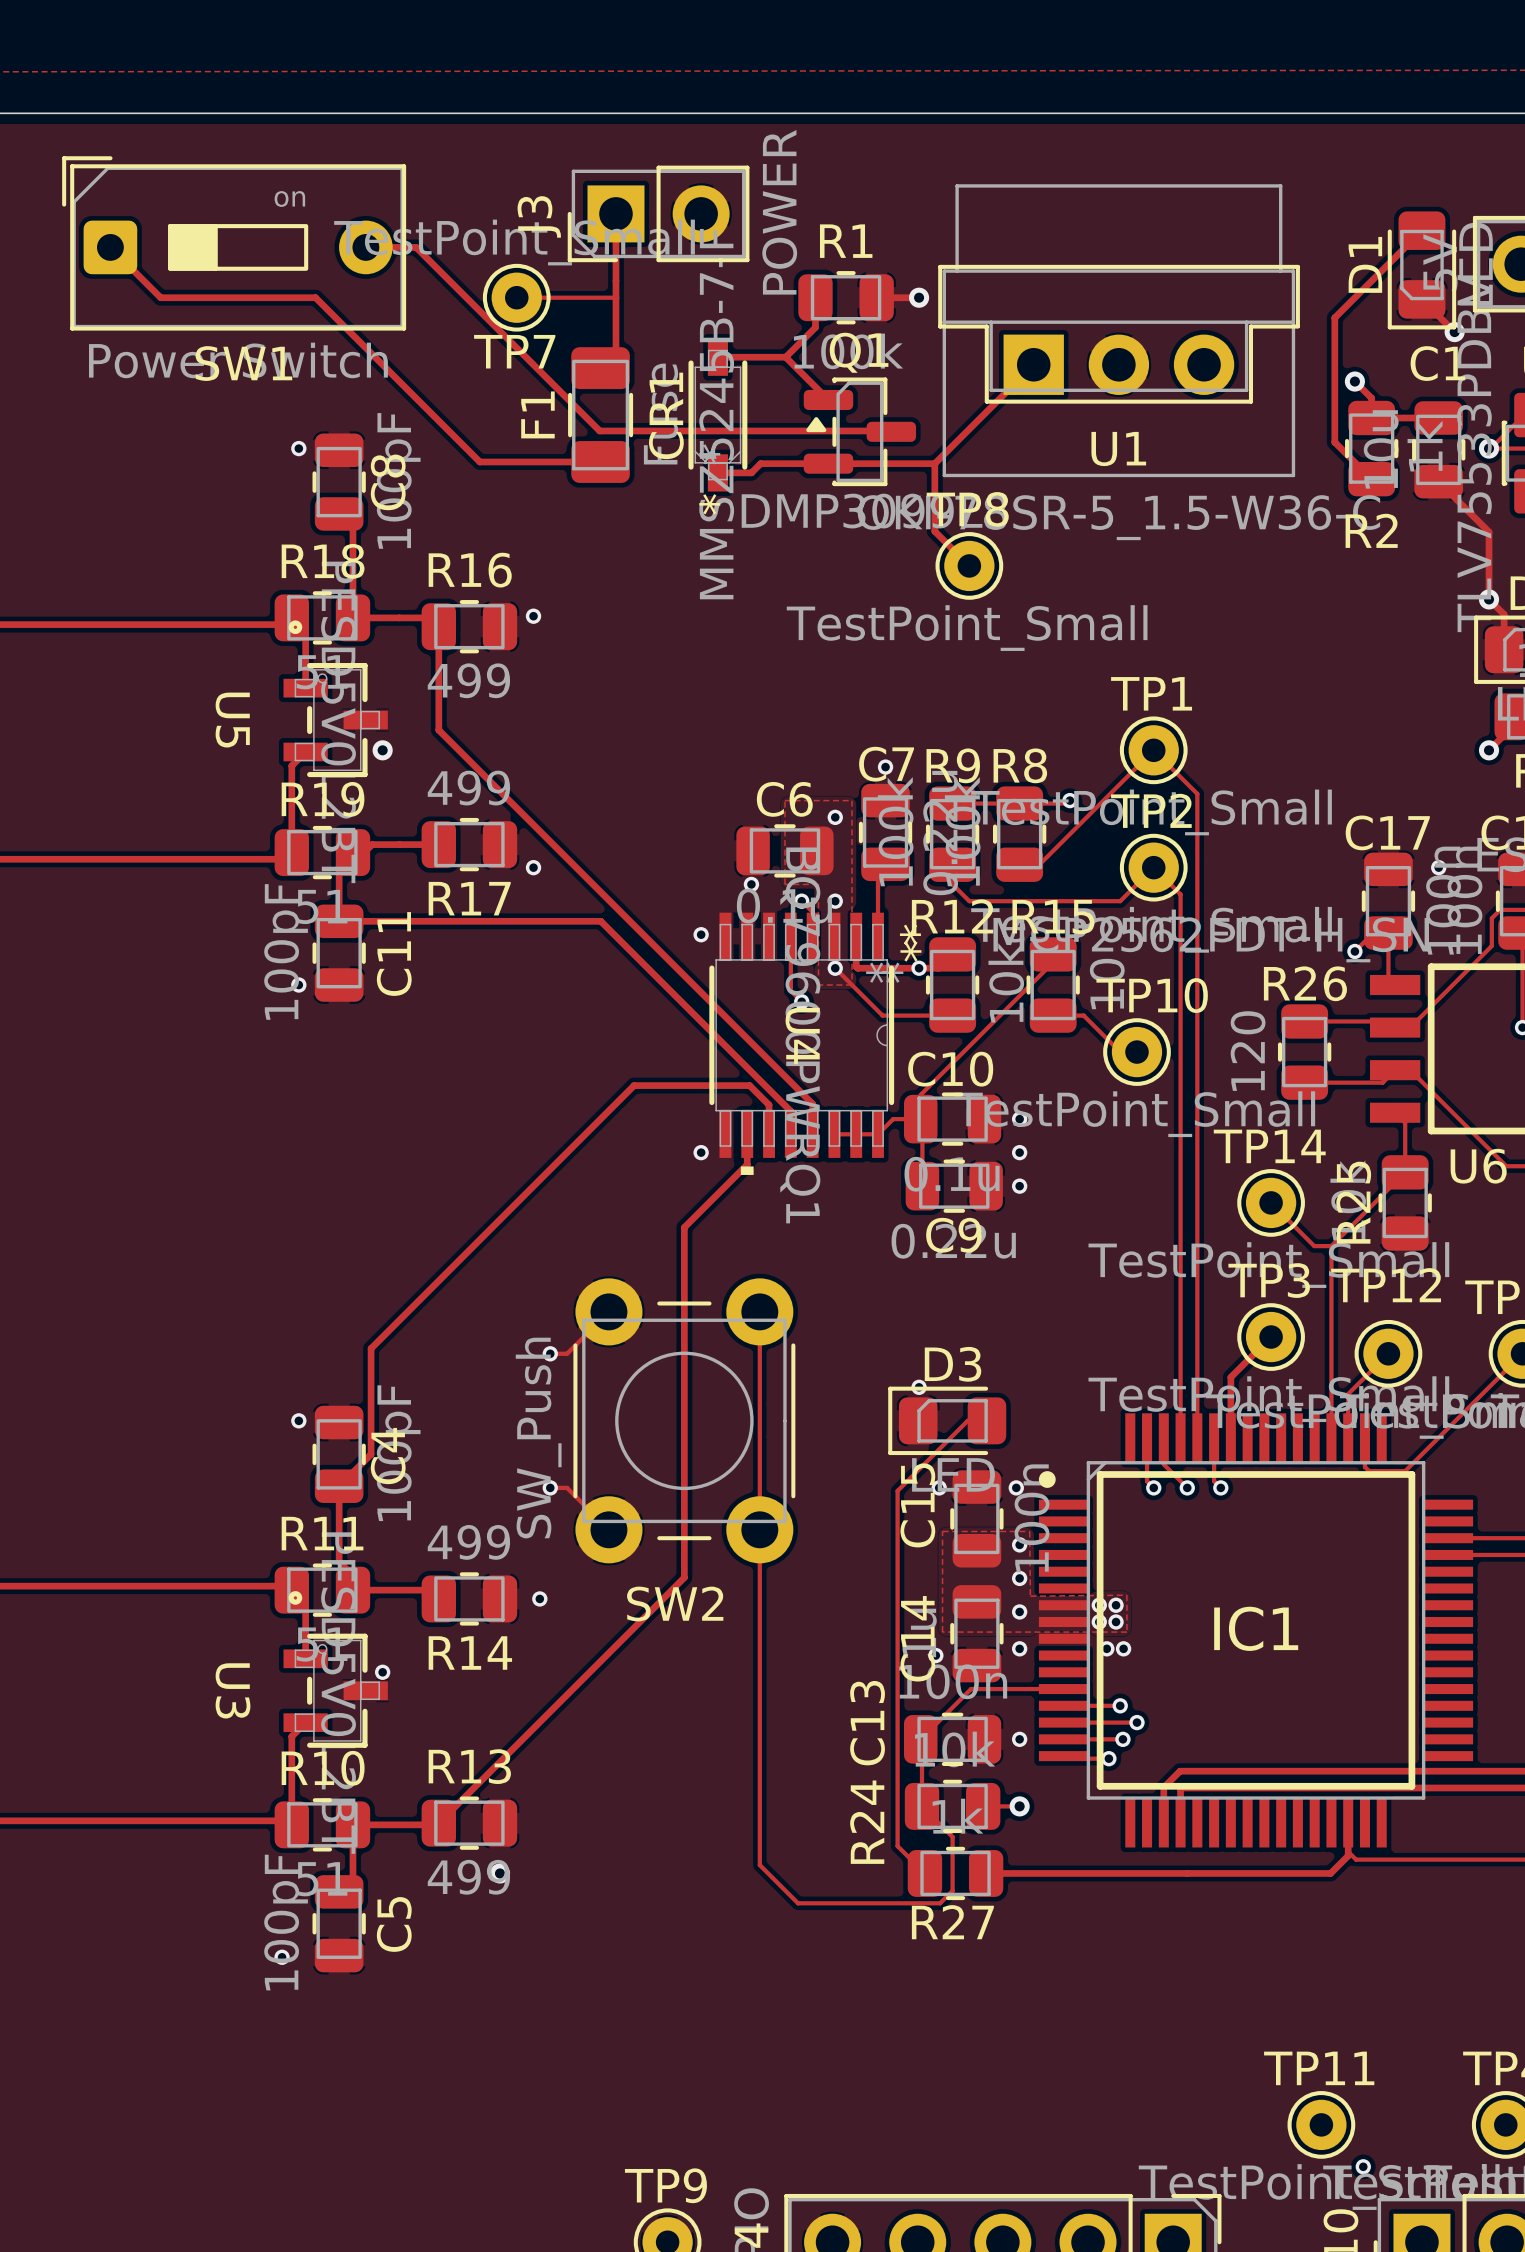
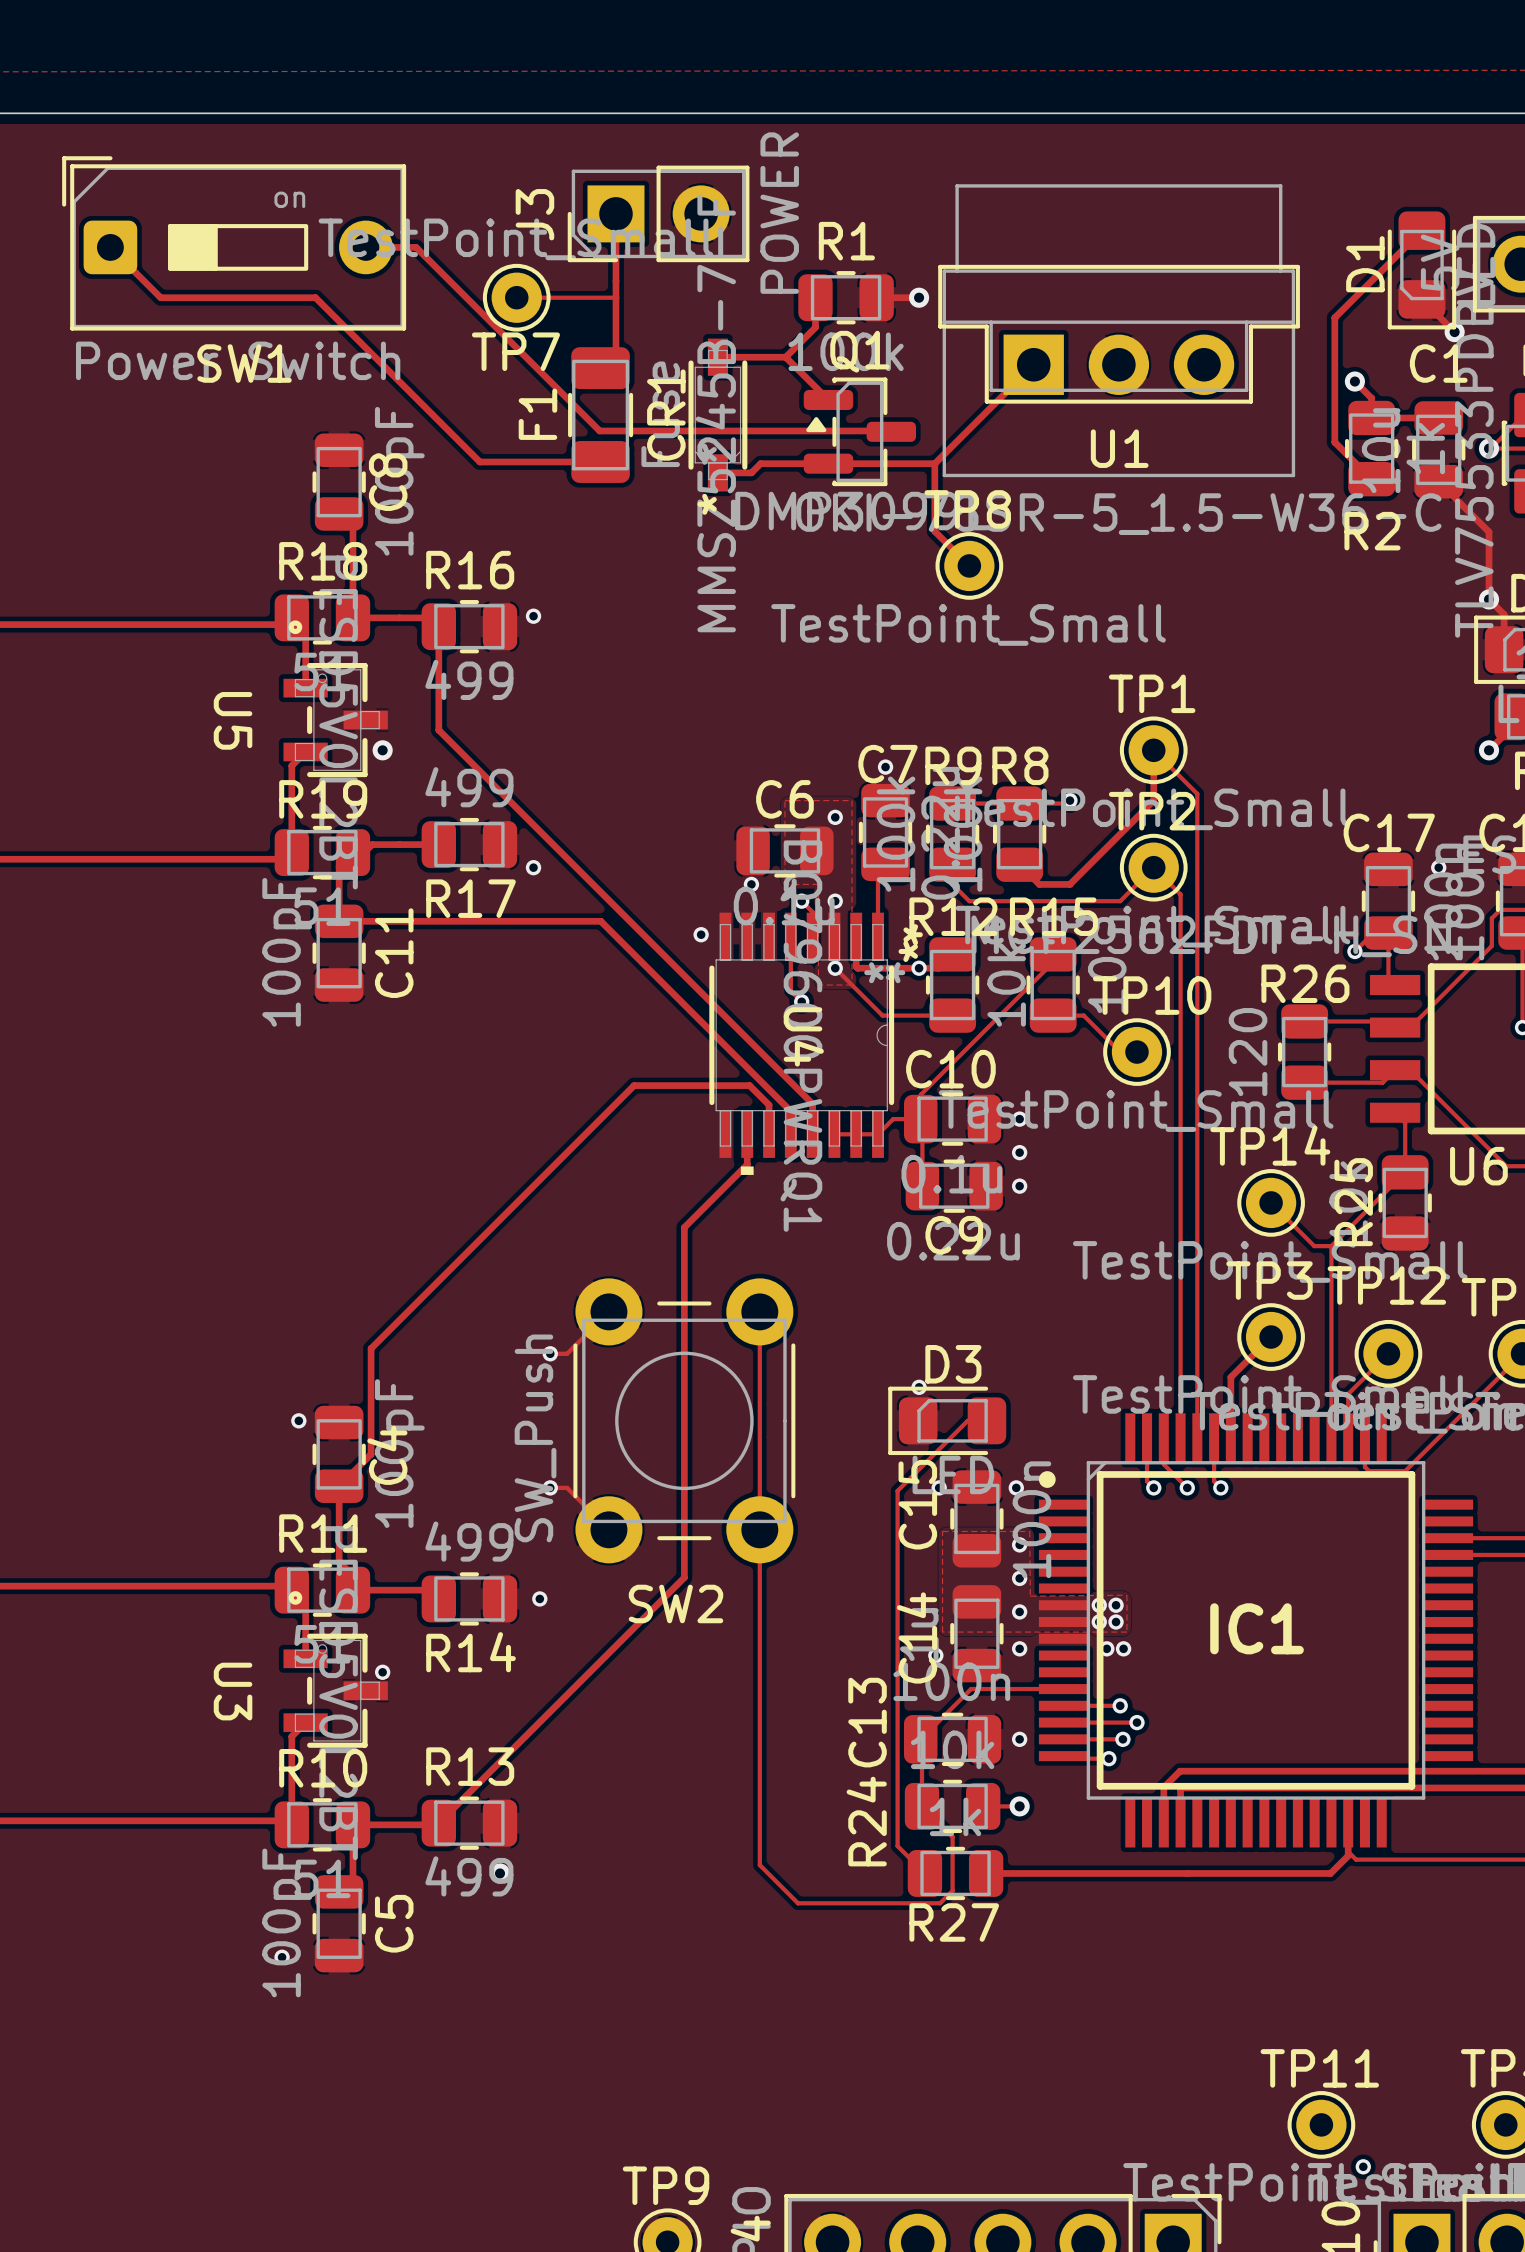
via: (298, 448) -> none
track: (1153, 750) (1039, 864) (1019, 864) -> (1153, 750) (1153, 800) (1069, 884) (1039, 884) (1019, 864)
via: (298, 985) -> none
via: (701, 1152) -> none

